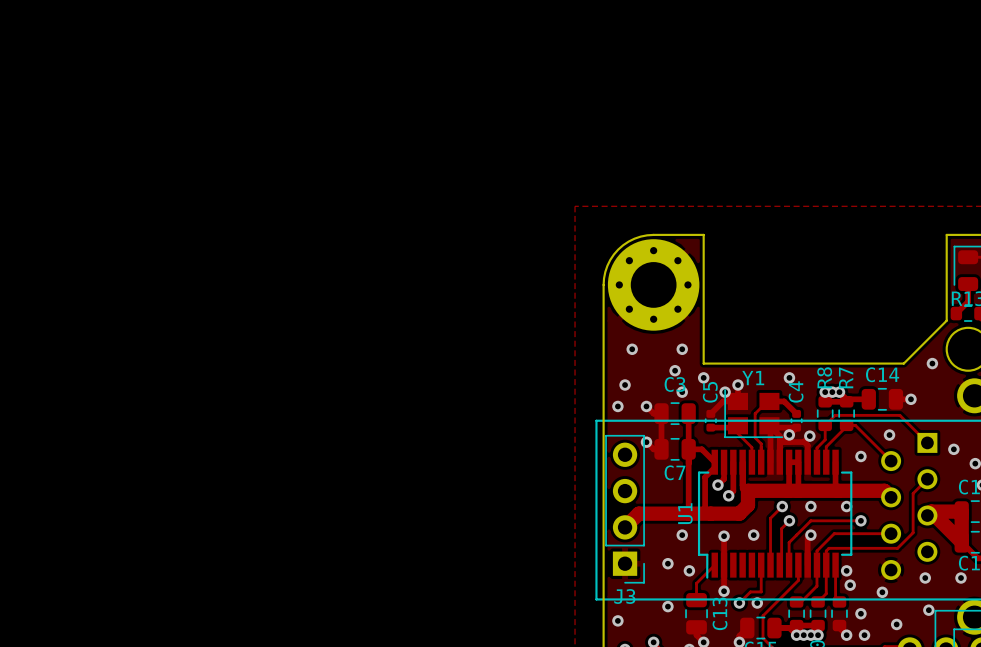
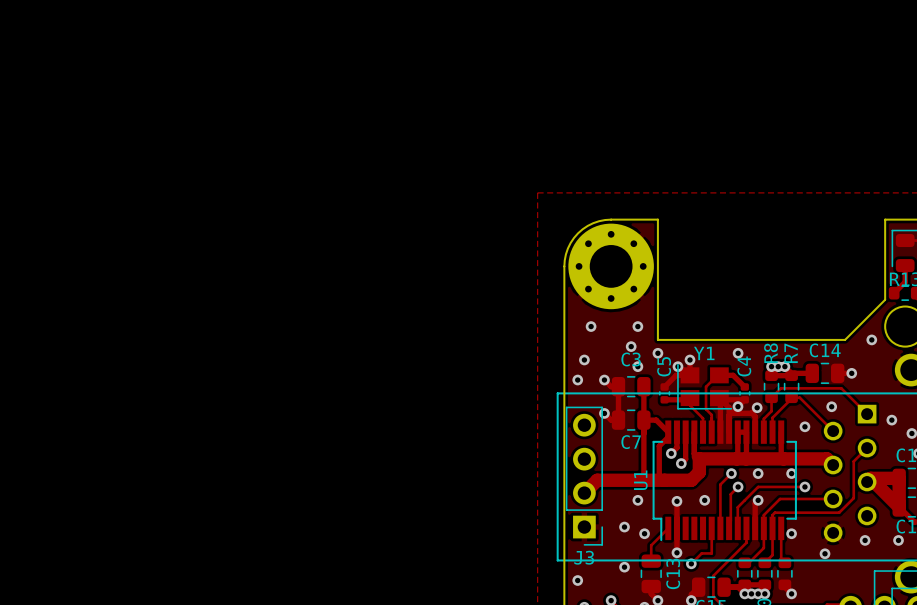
via: (850, 585) -> none
via: (757, 603) -> none
via: (928, 610) -> none
via: (860, 613) -> none
via: (896, 624) -> none
via: (864, 635) -> none

